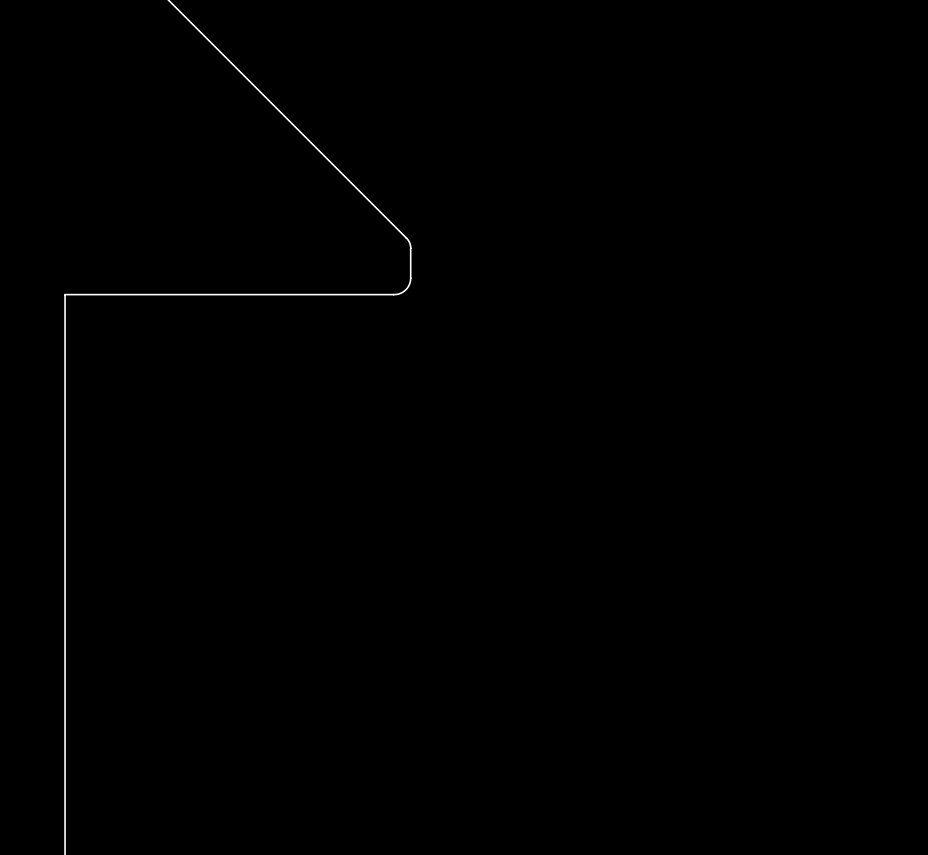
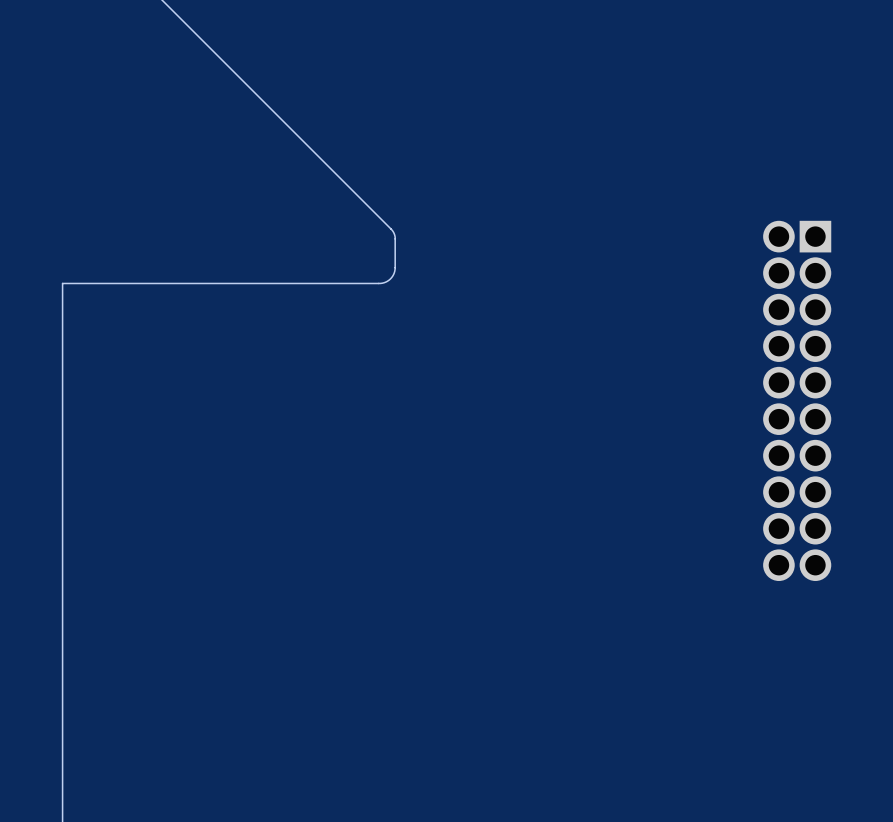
part: none -> (797, 400)

